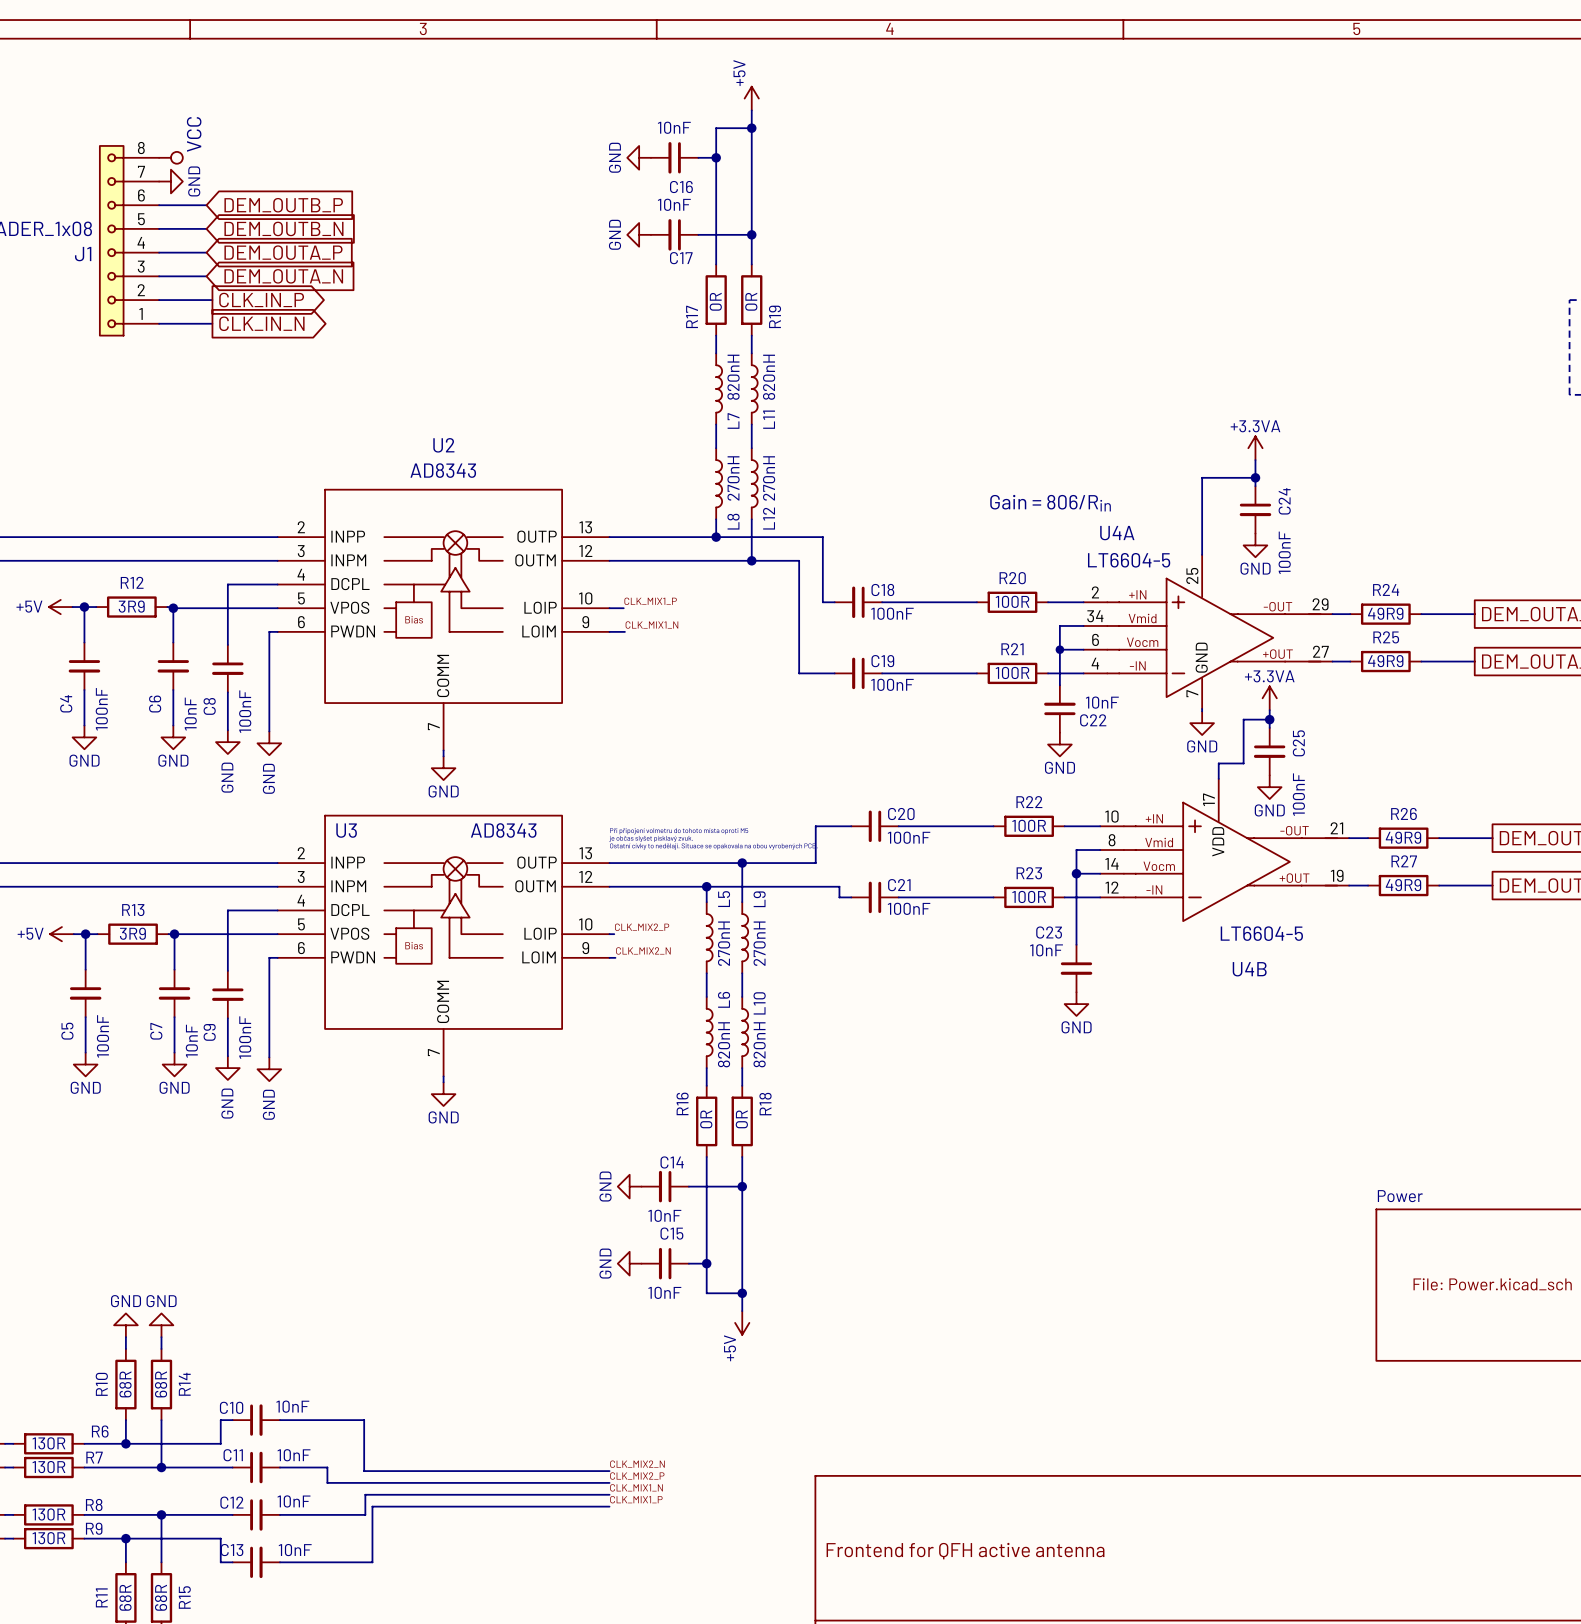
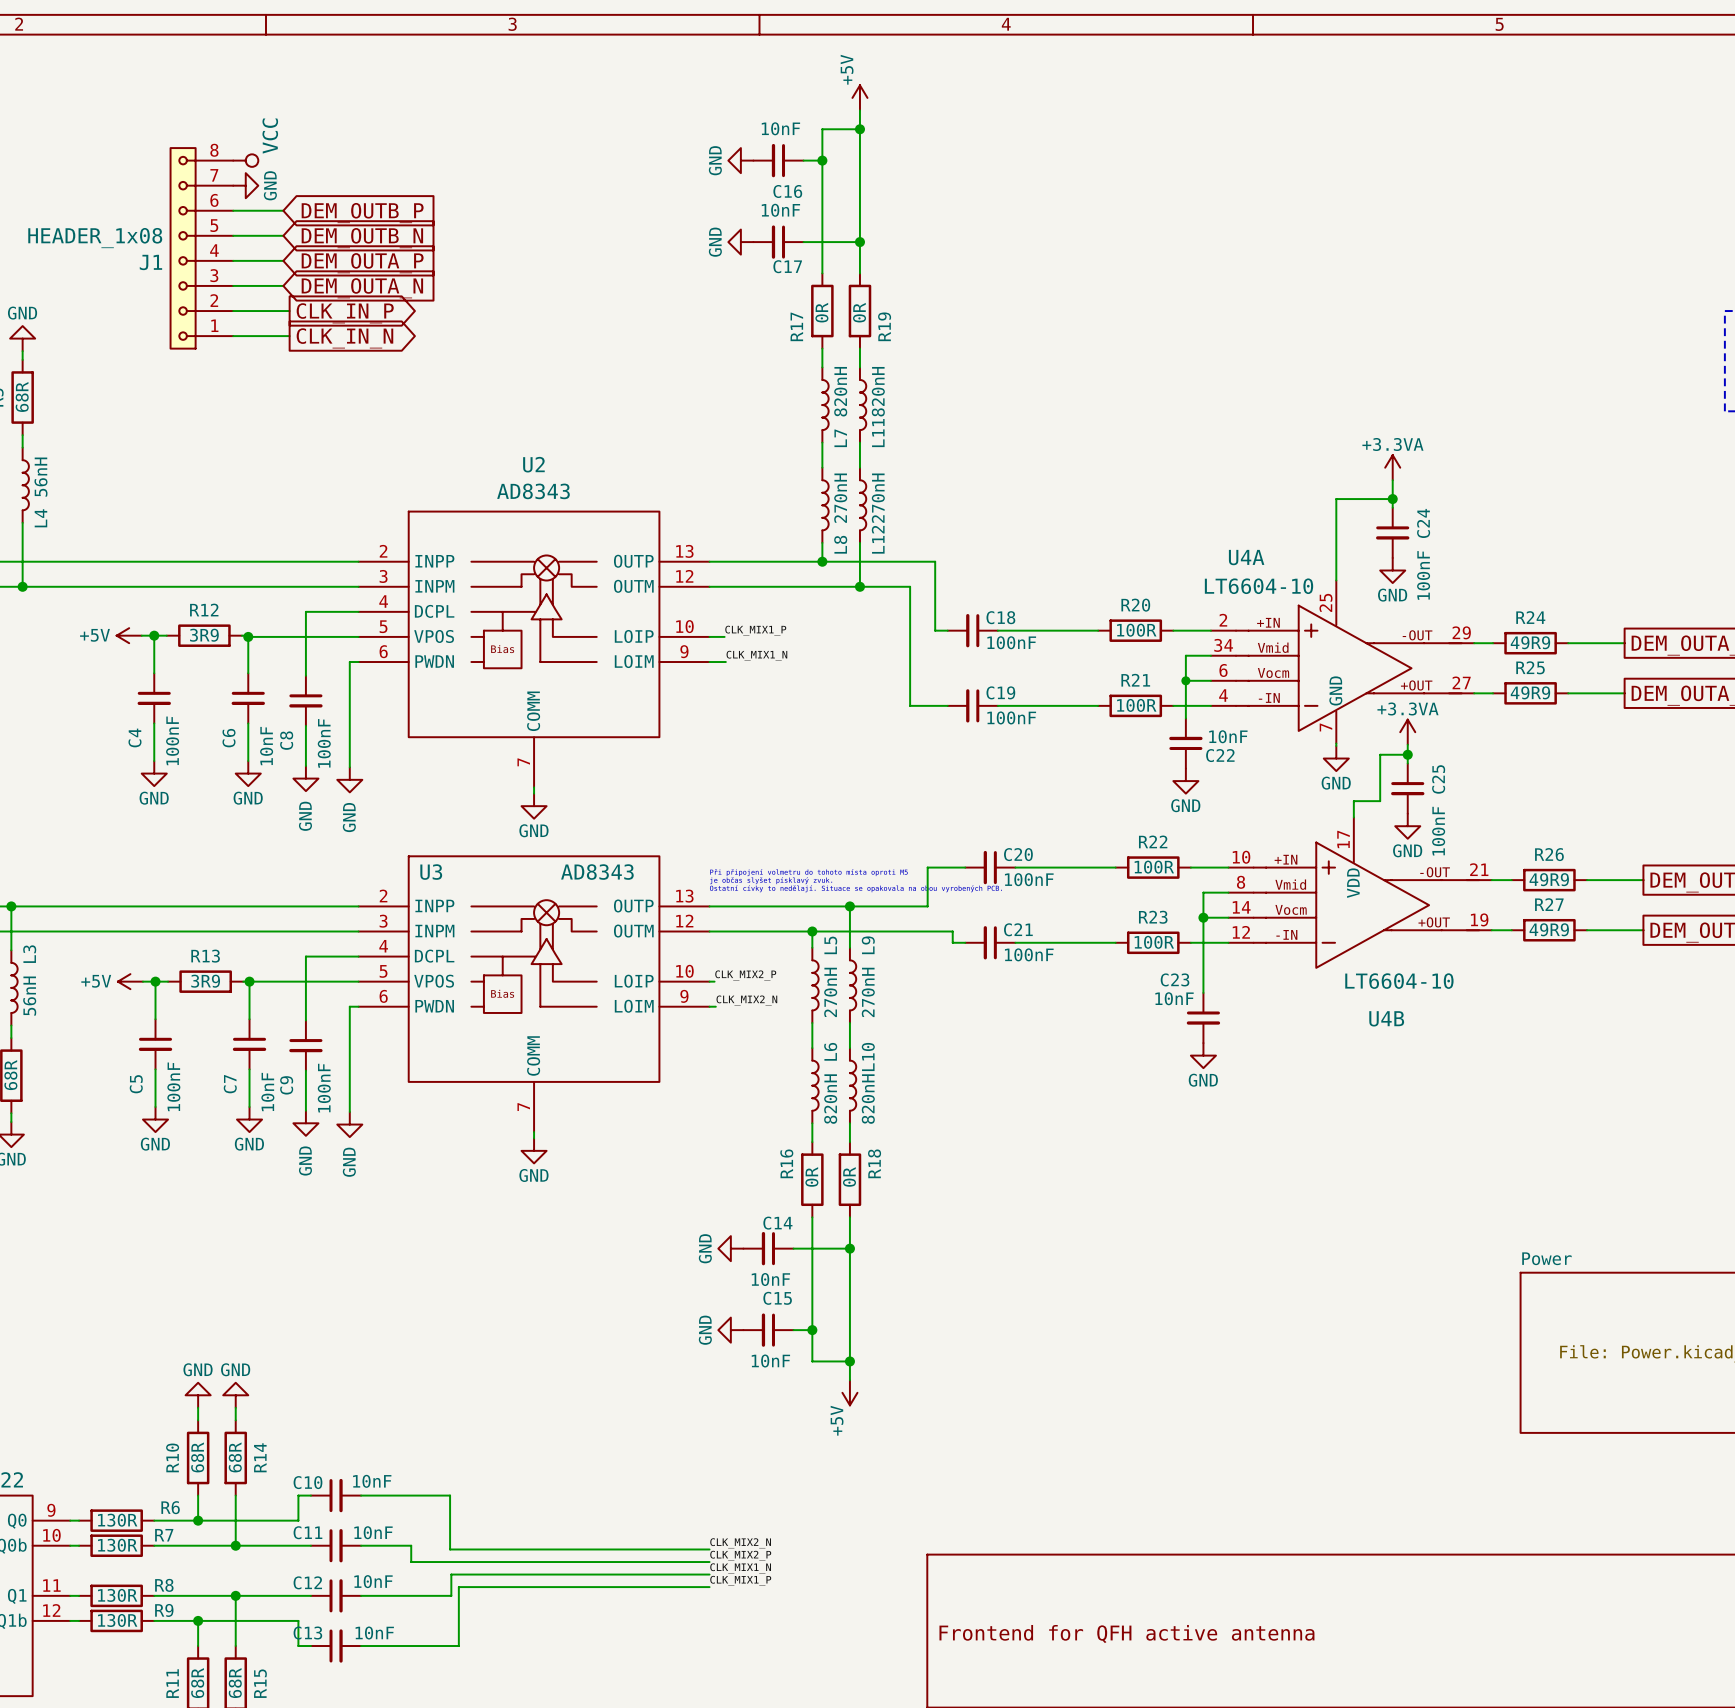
text: Gain = 806/Rin (1050, 503) -> none
U4A value: LT6604-5 (1129, 560) -> LT6604-10 (1259, 586)
U4B value: LT6604-5 (1261, 933) -> LT6604-10 (1399, 981)

